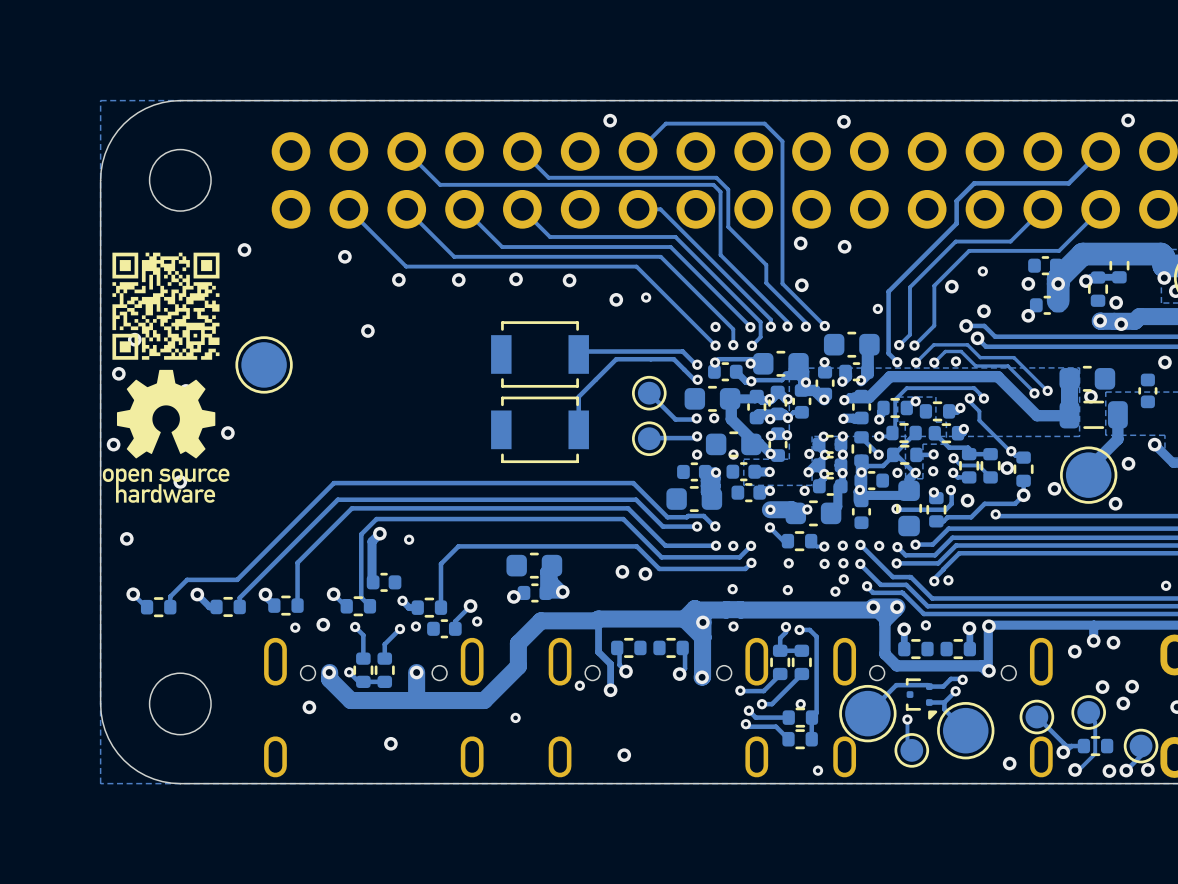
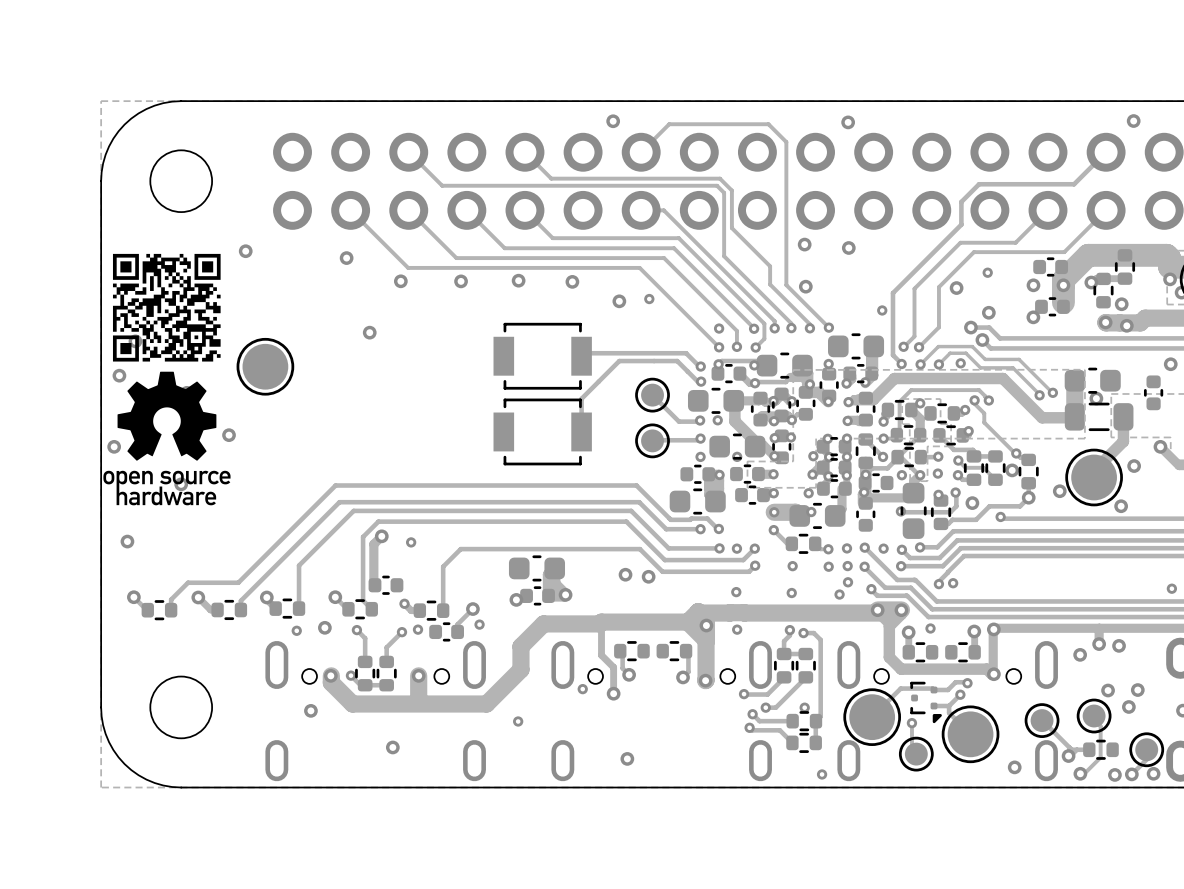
track: none -> (911, 410) (920, 418) (920, 435)

